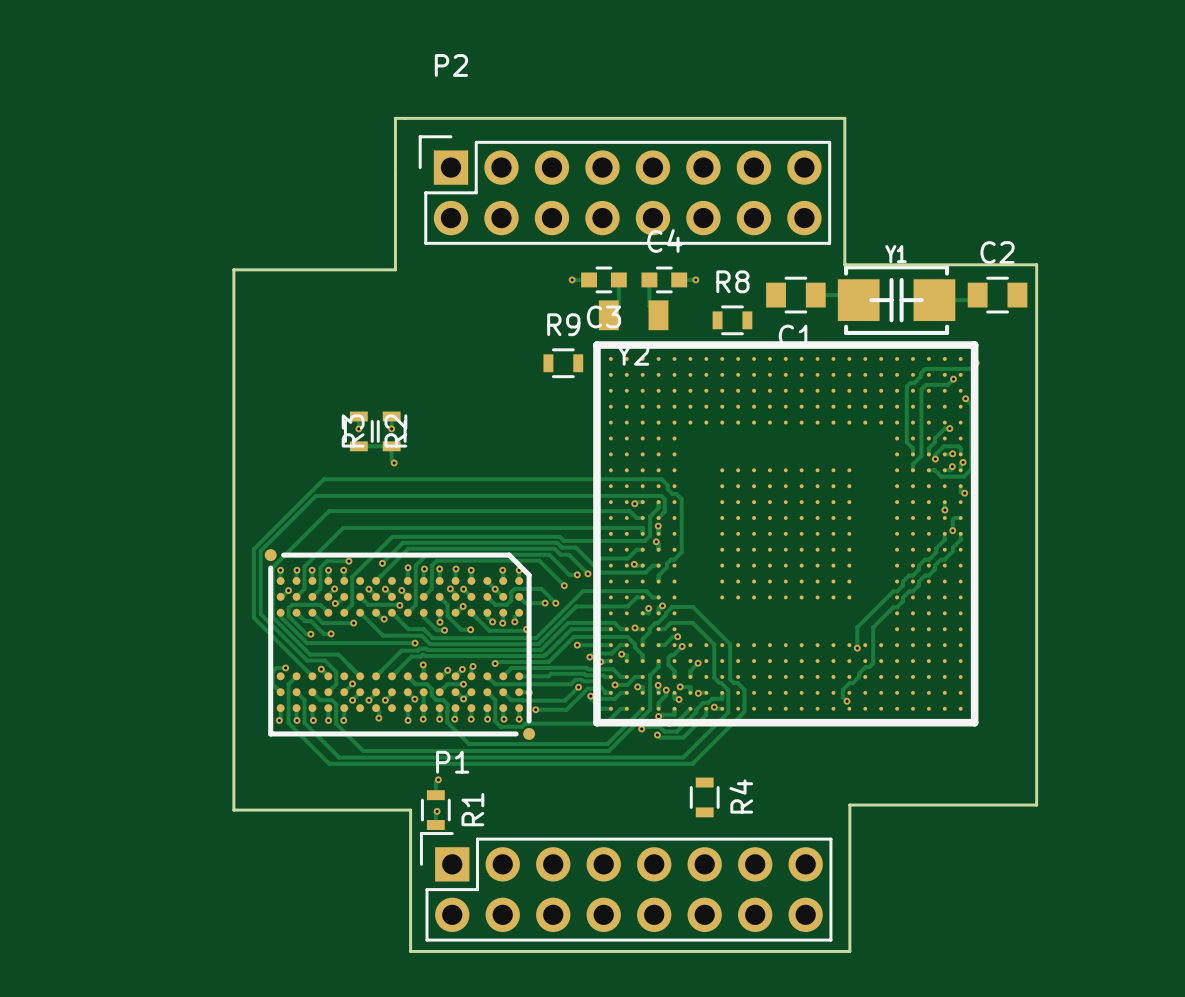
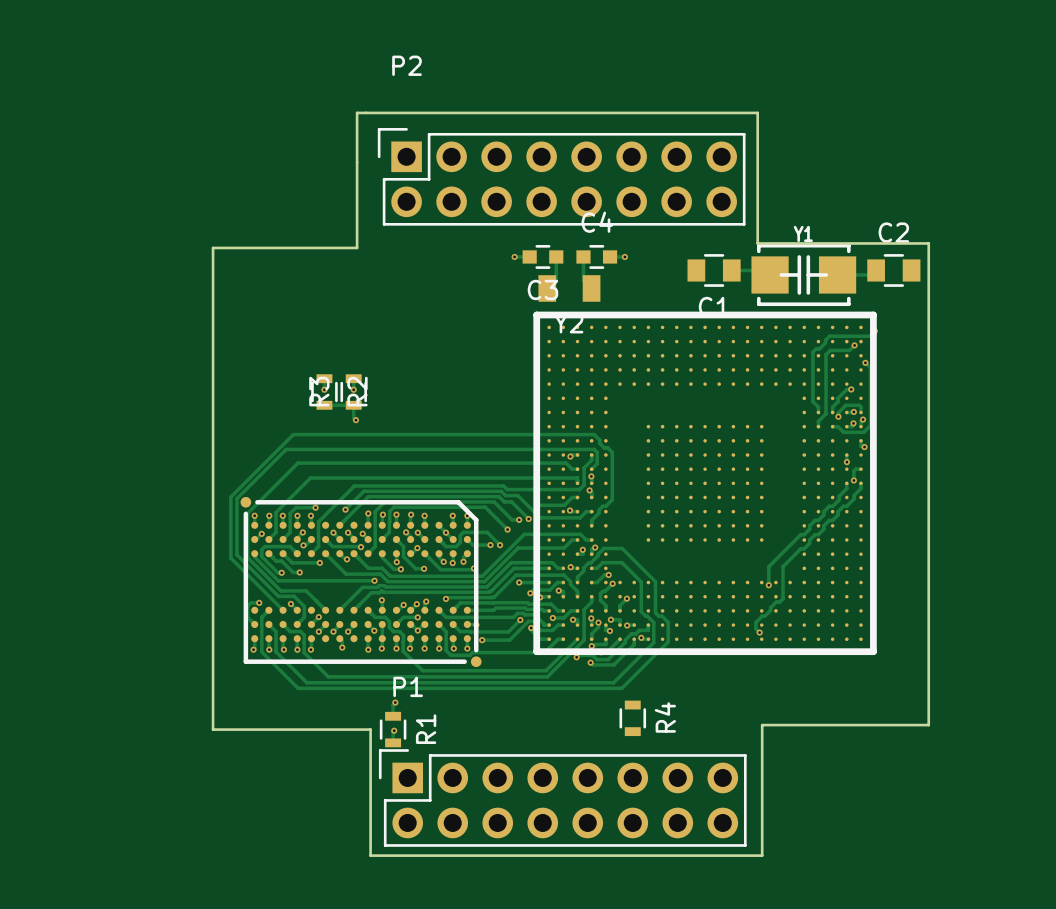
R8: (732, 320) -> none
R9: (563, 363) -> none

